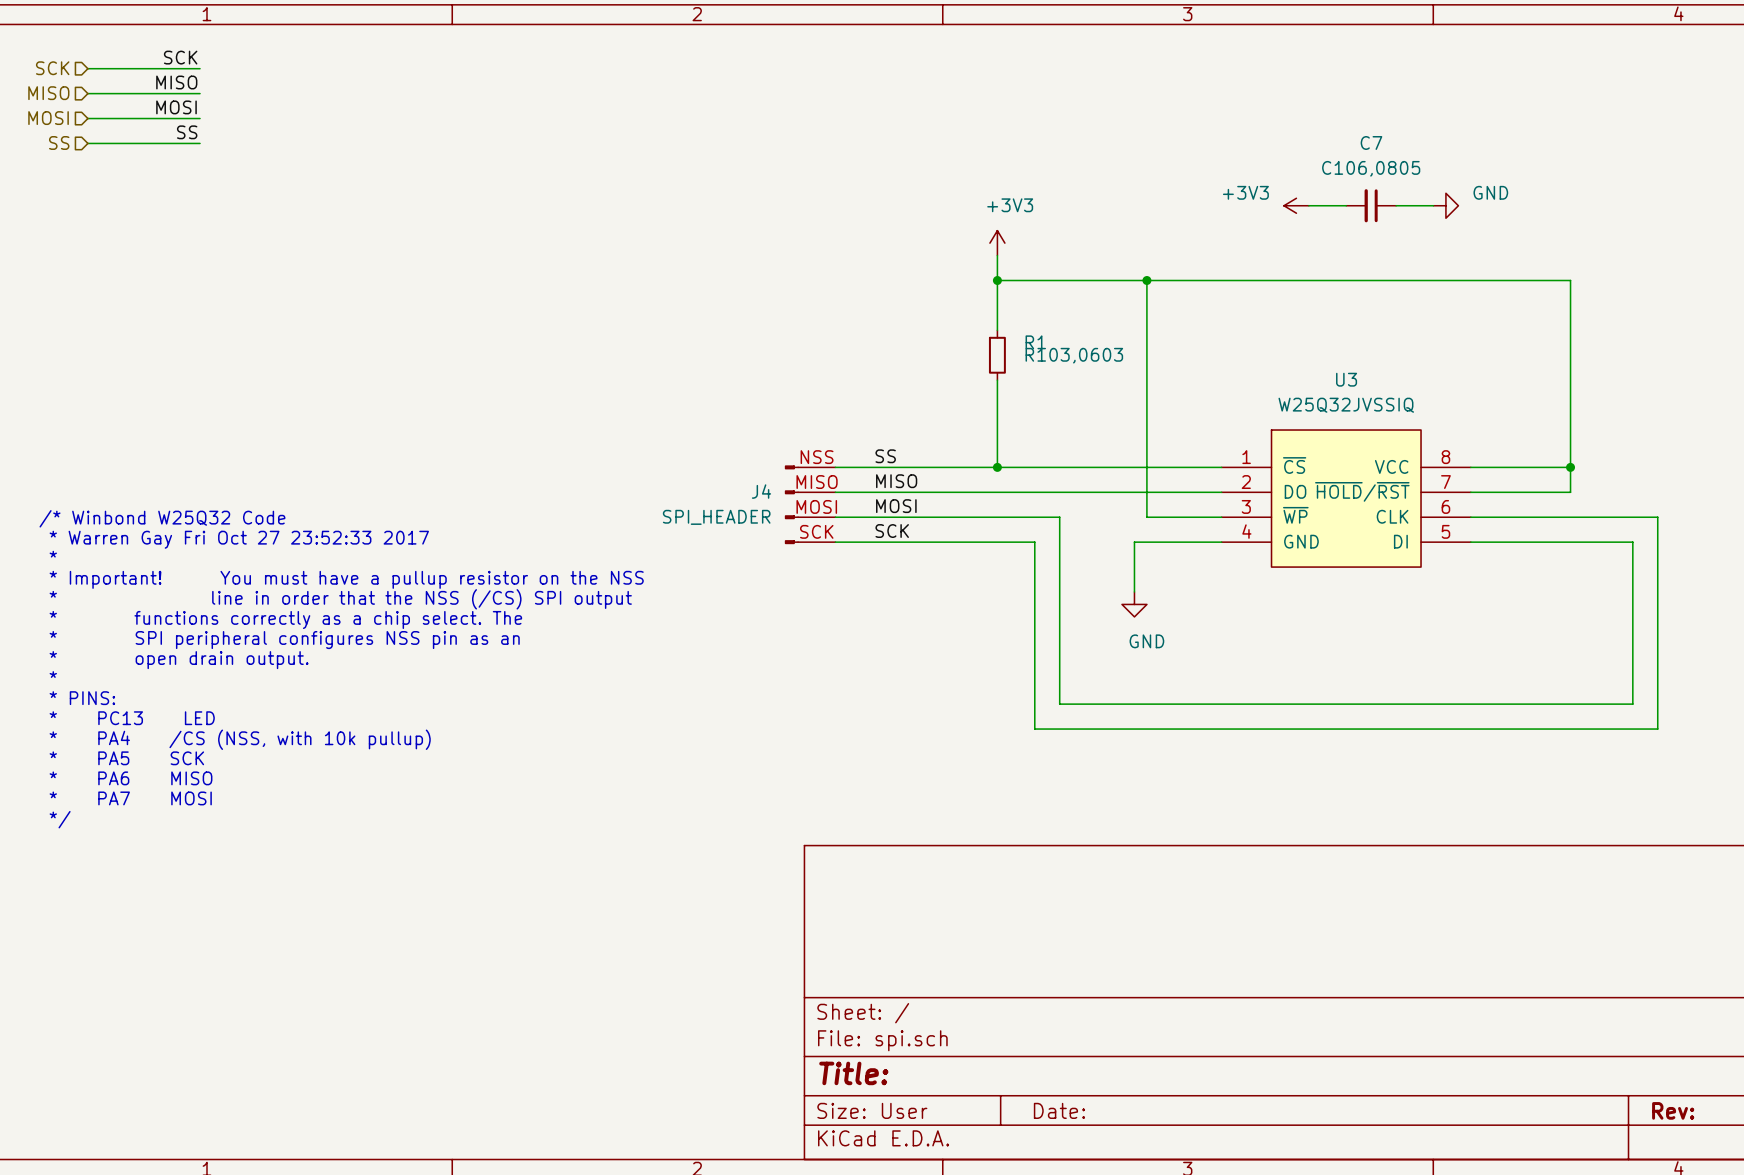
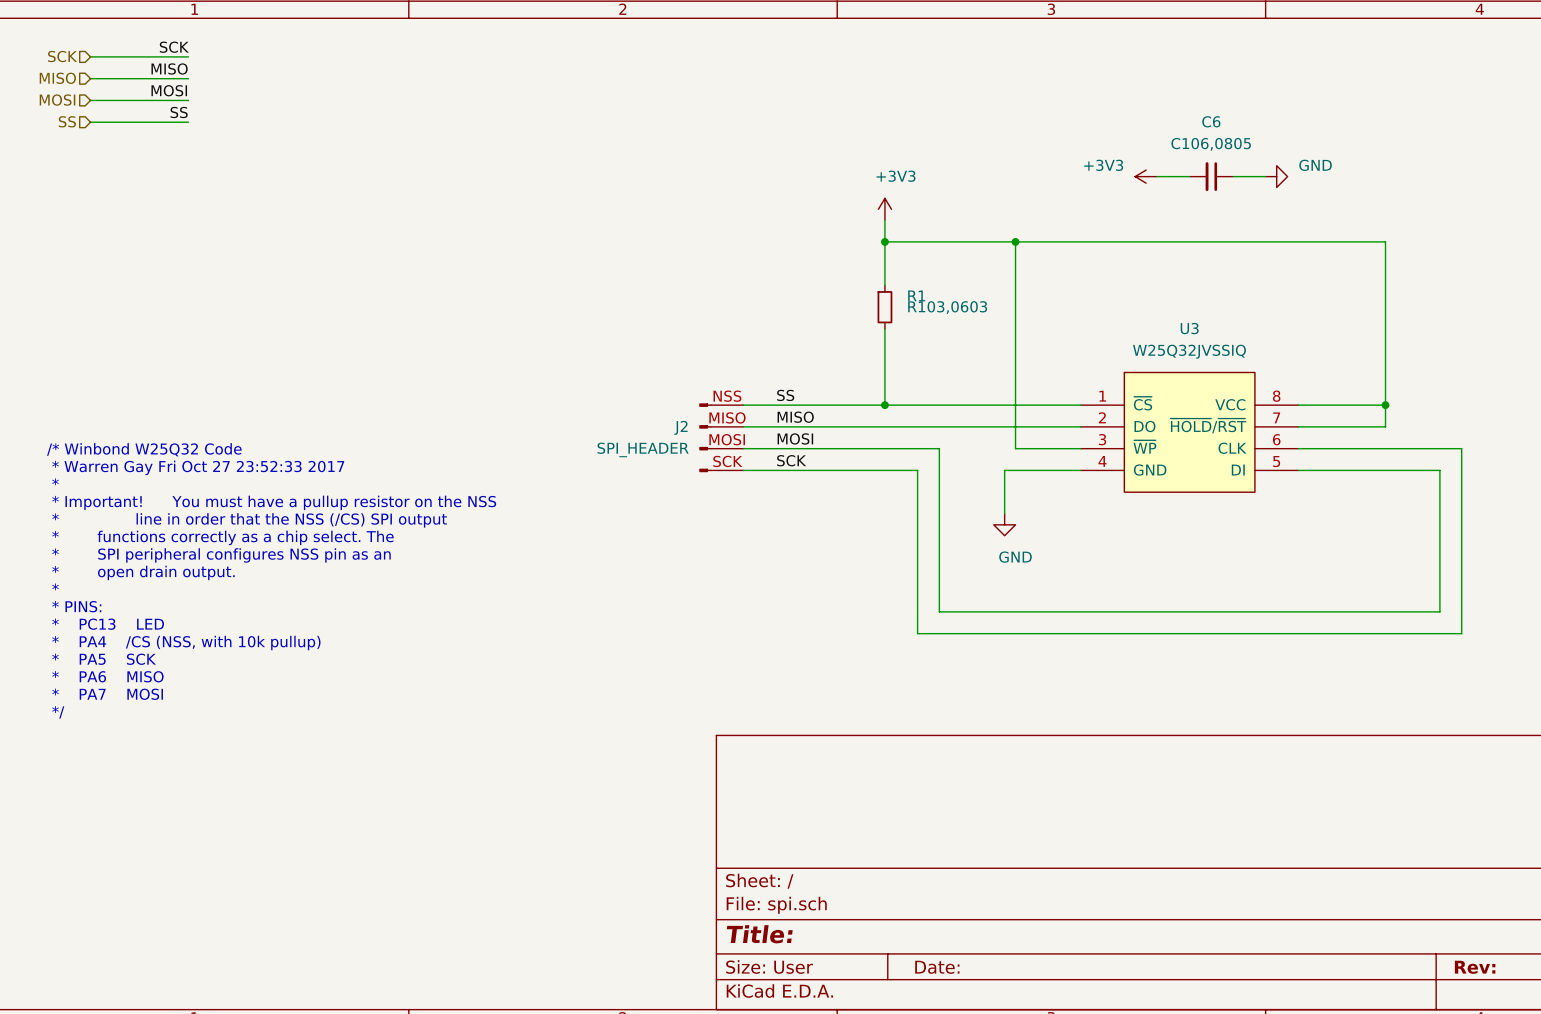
C7 name: C7 (1371, 142) -> C6 (1211, 121)
J4 name: J4 (761, 491) -> J2 (680, 427)

